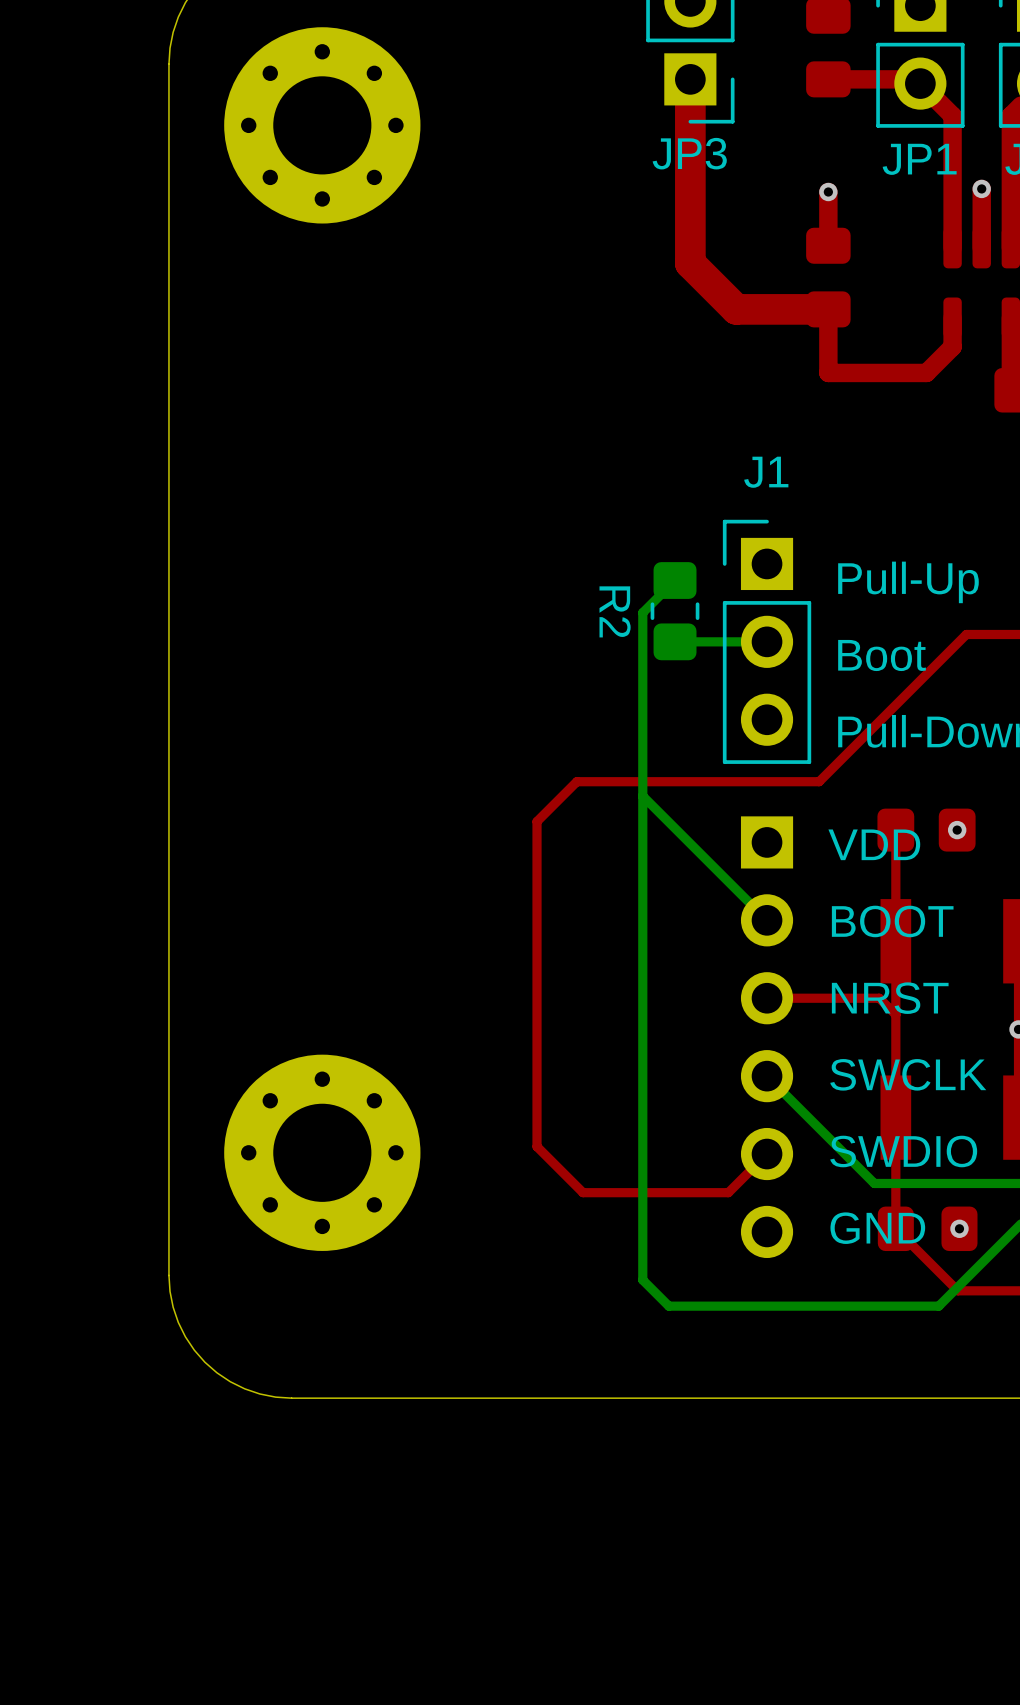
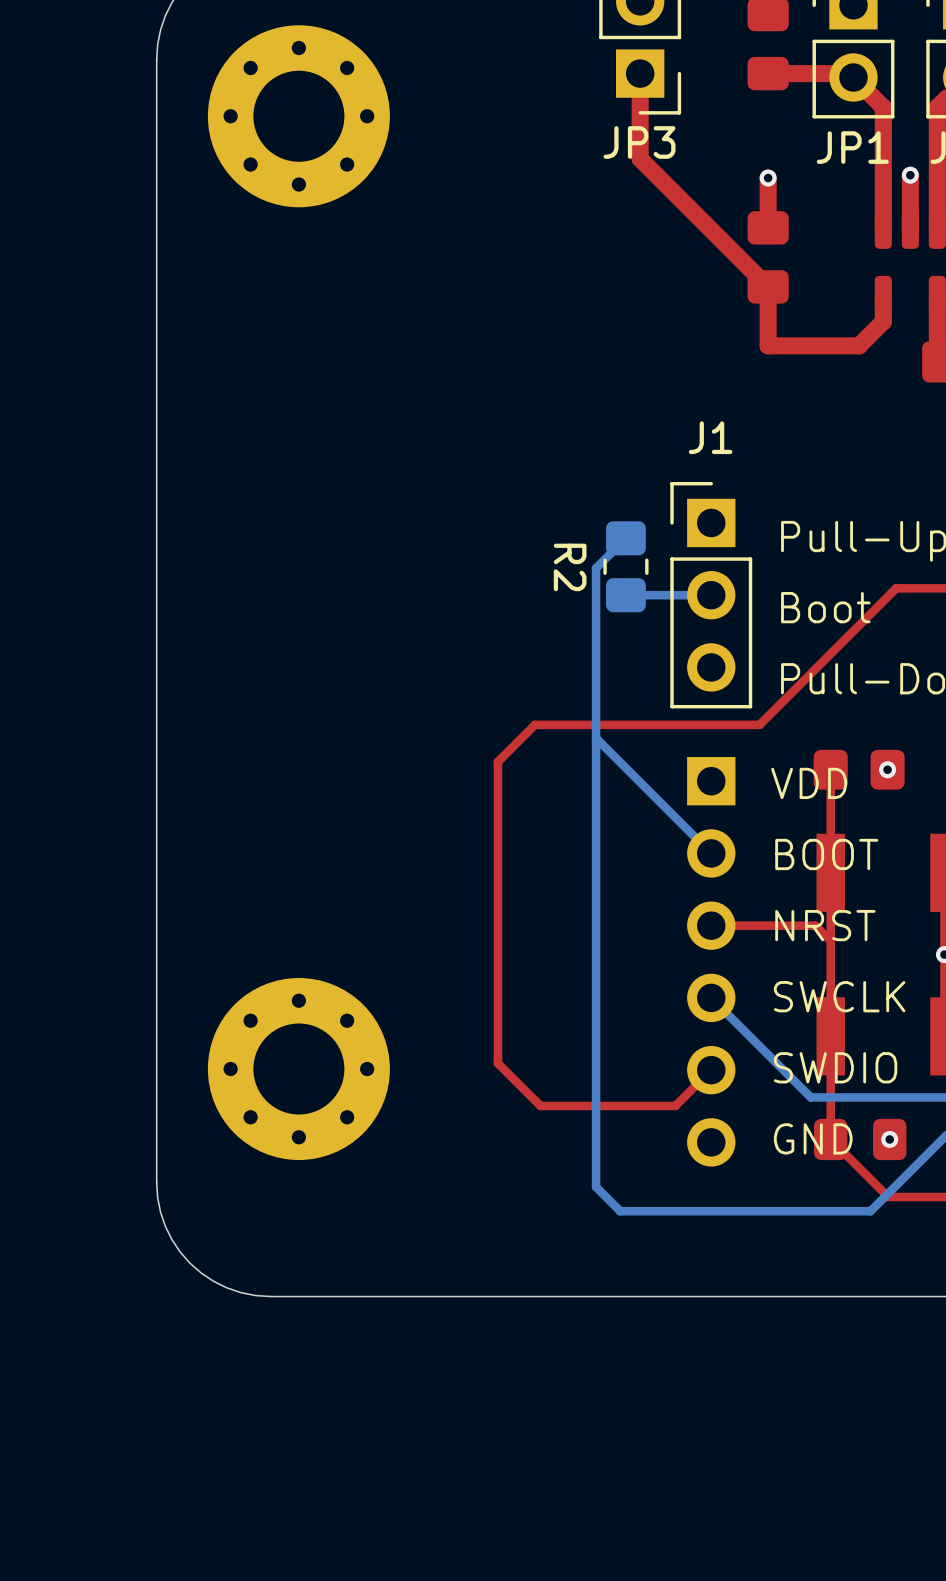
top track width: thick (690, 79) (690, 171) -> thin (640, 73) (640, 158)
top track: (690, 171) (690, 263) (736, 309) (828, 309) -> (640, 158) (768, 286)

